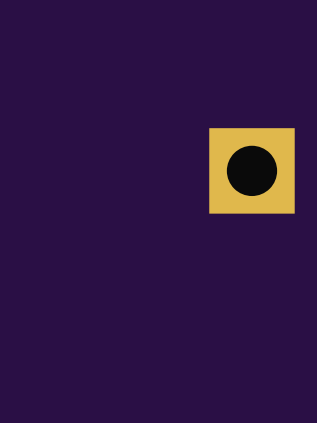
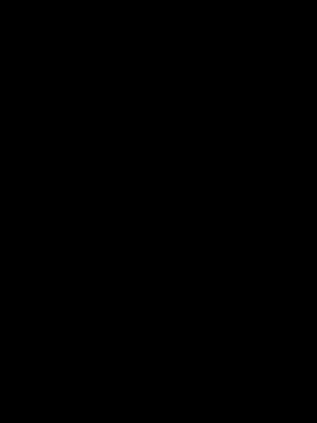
part: (251, 170) -> none

